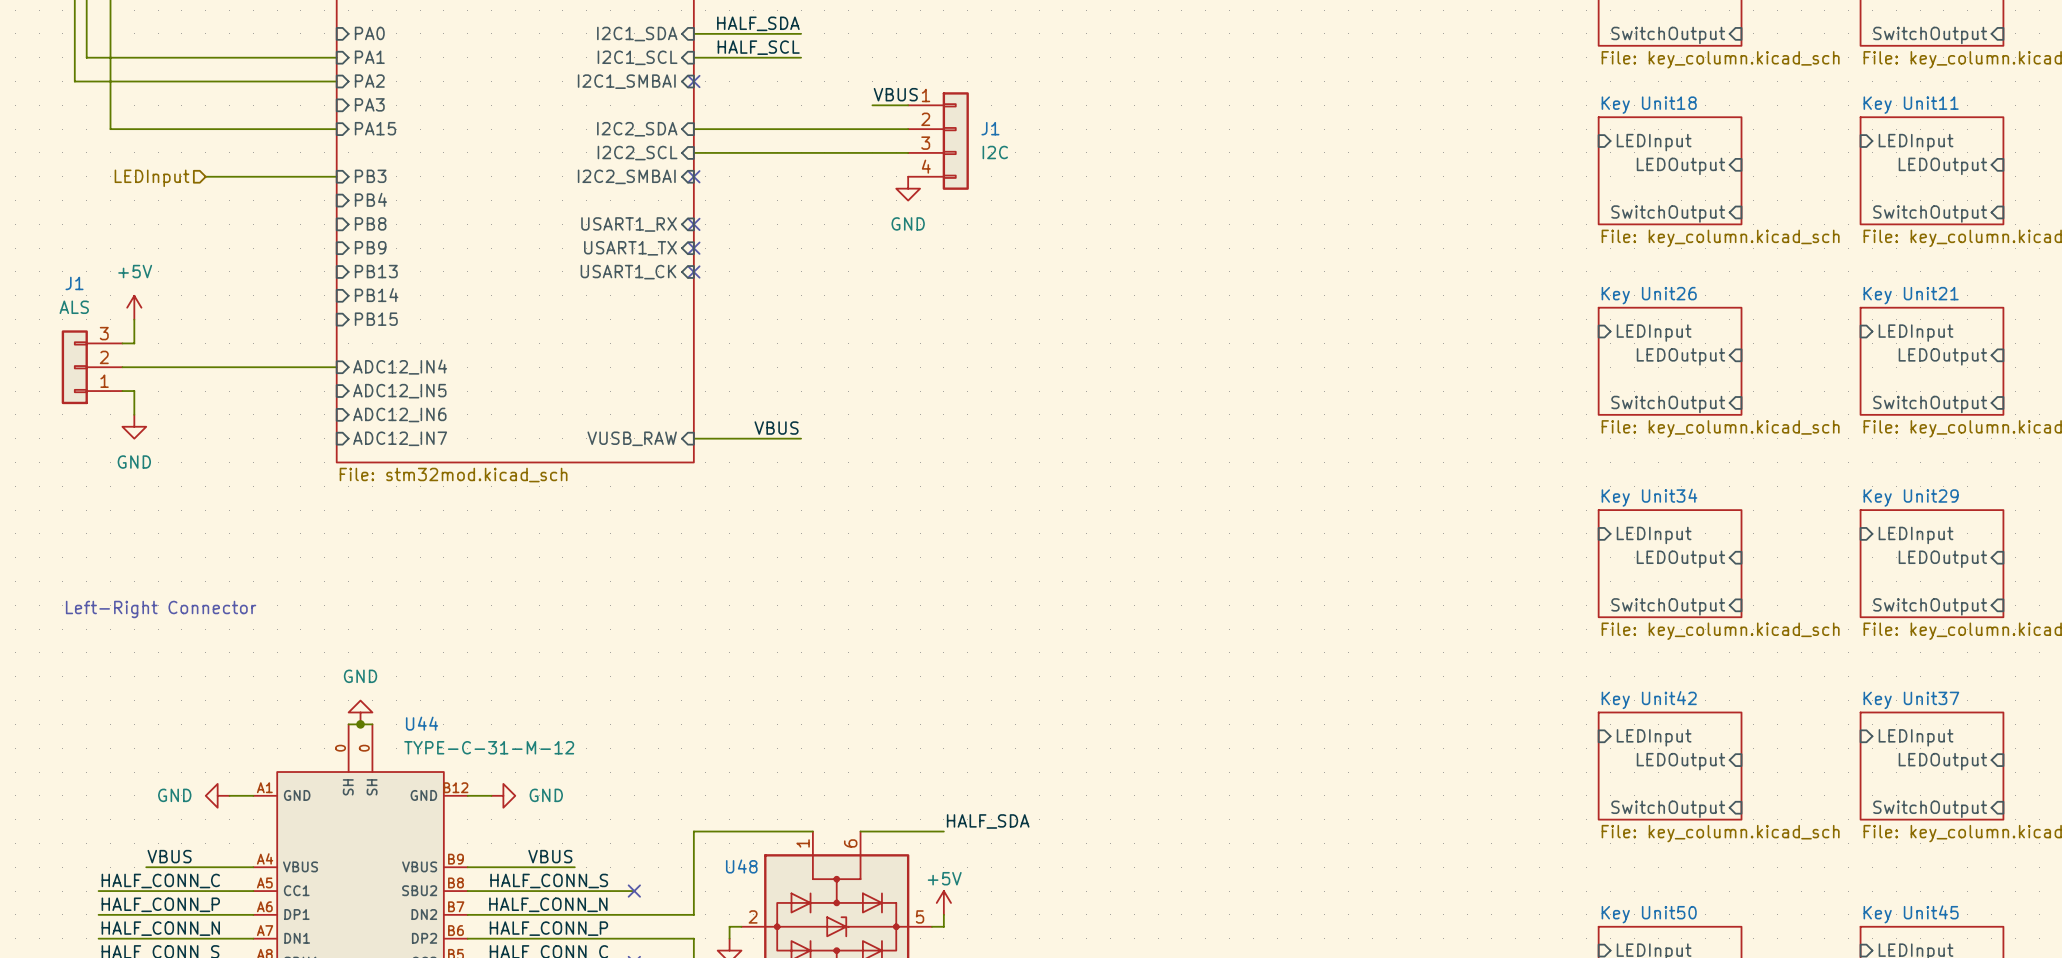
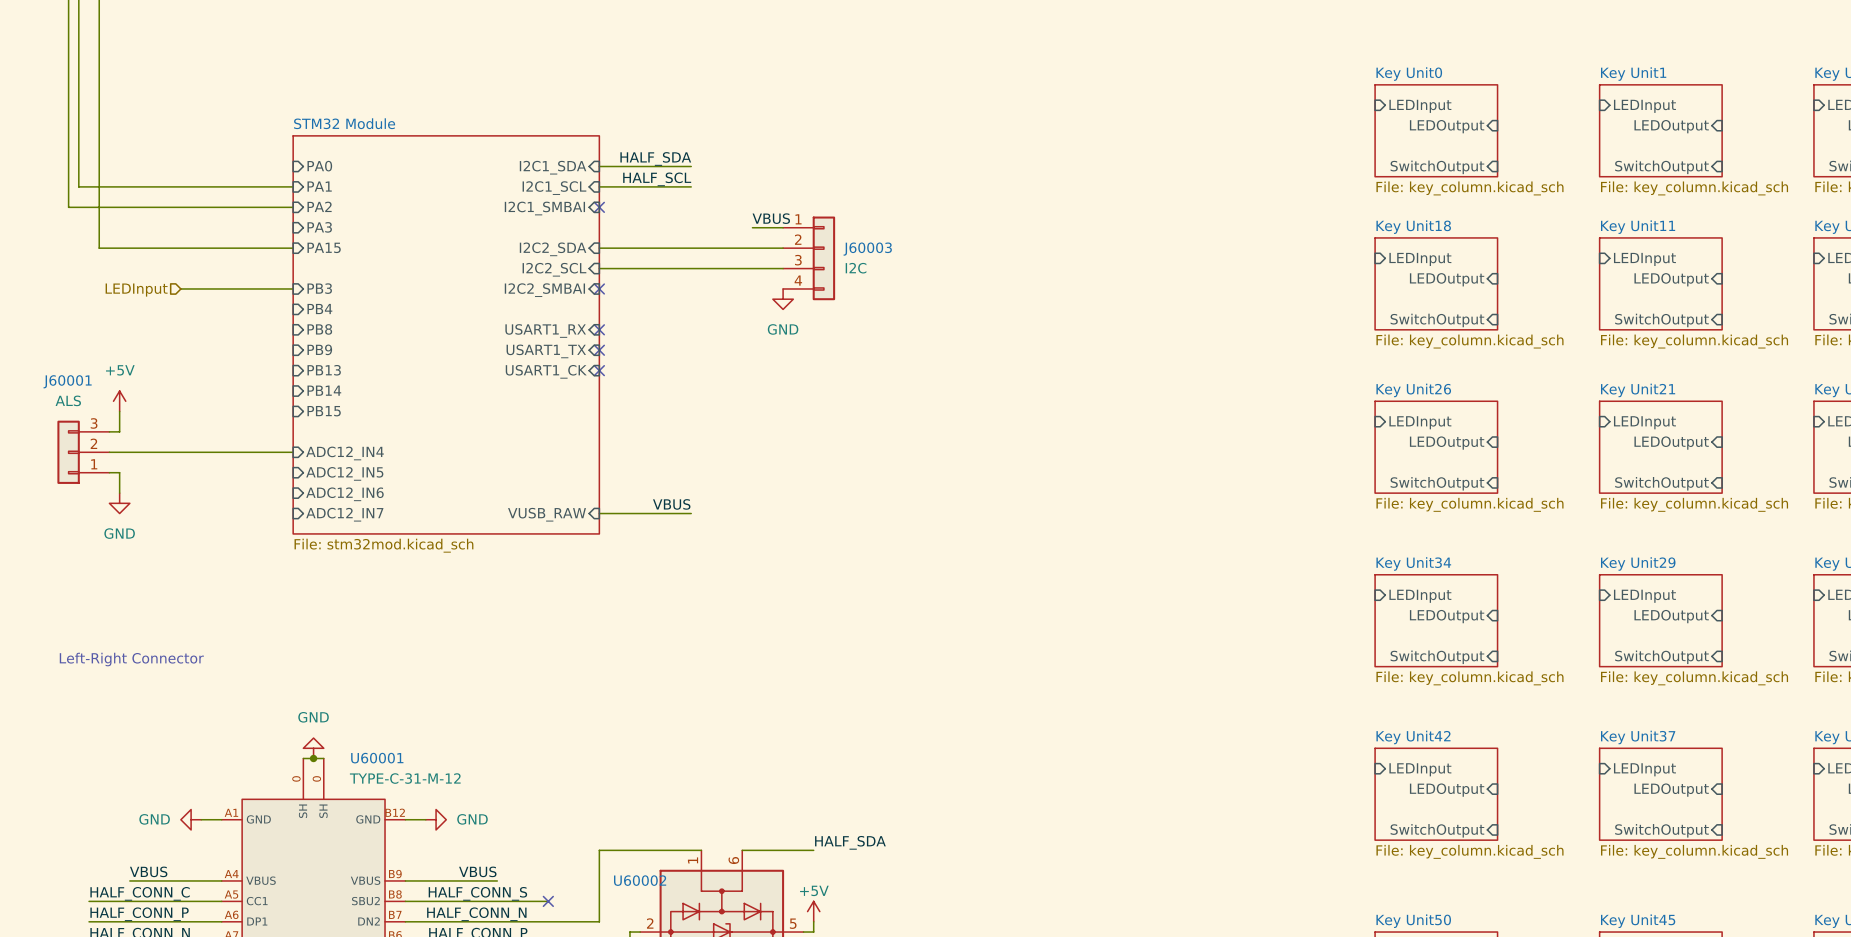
J1 name: J1 (990, 128) -> J60003 (867, 249)
J1 name: J1 (74, 283) -> J60001 (67, 381)
U44 name: U44 (422, 723) -> U60001 (377, 758)
U48 name: U48 (741, 866) -> U60002 (640, 880)

